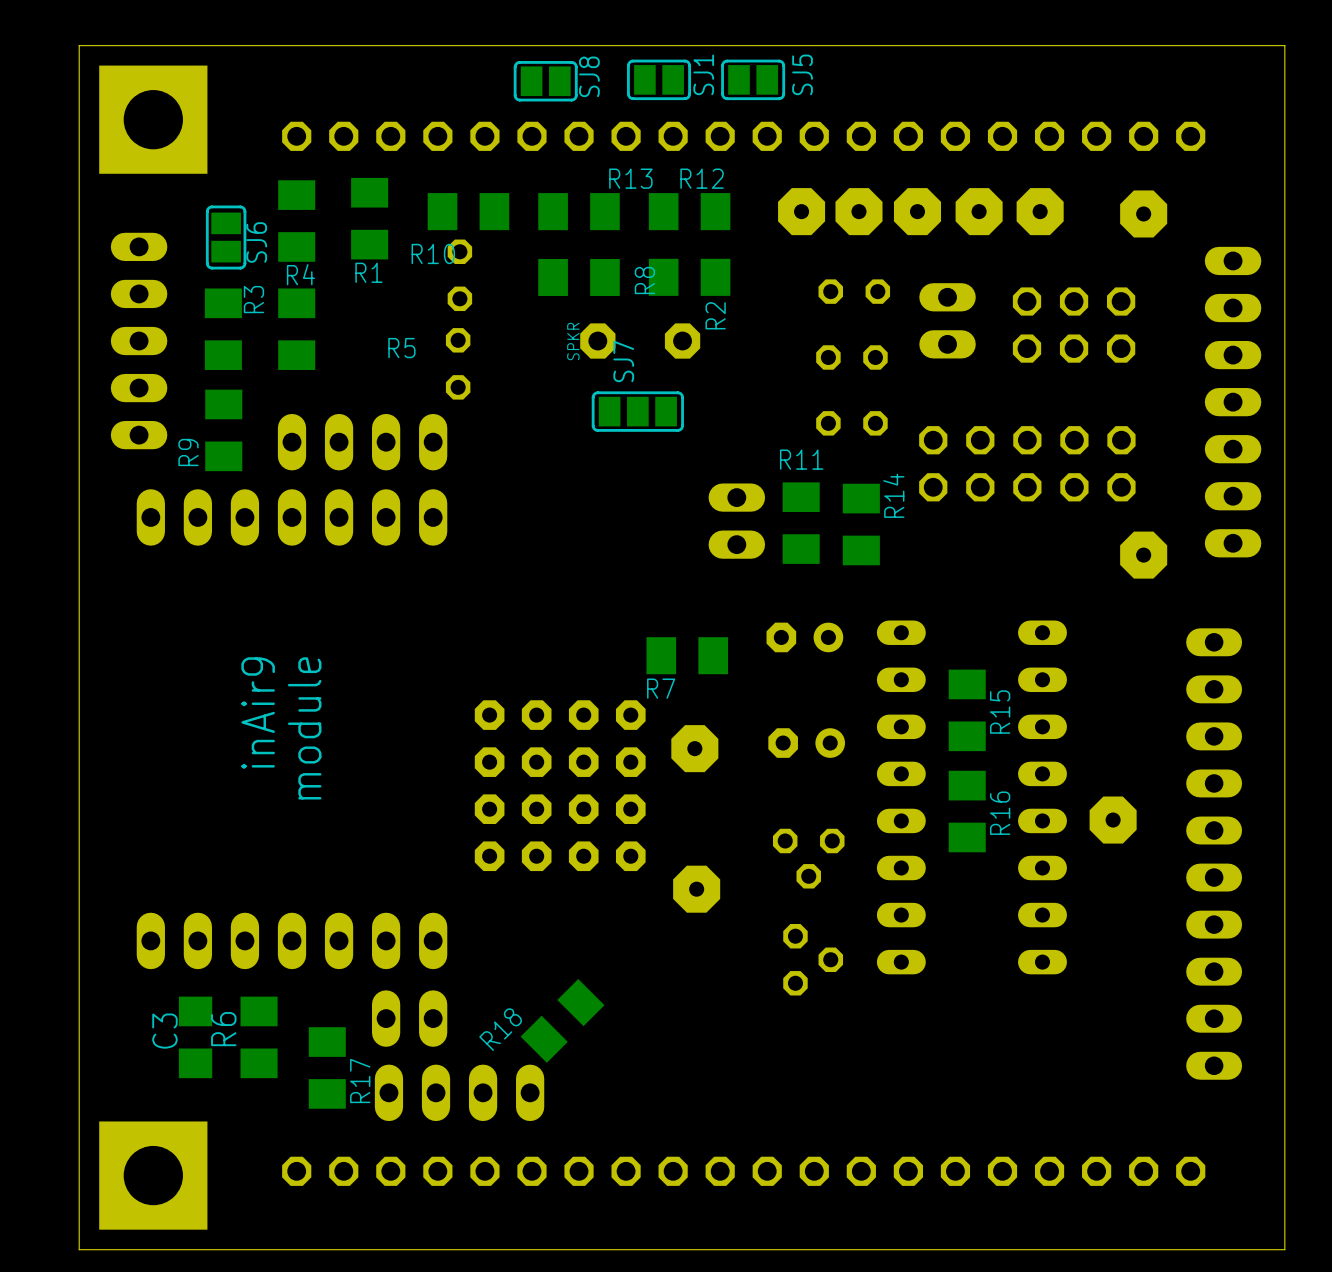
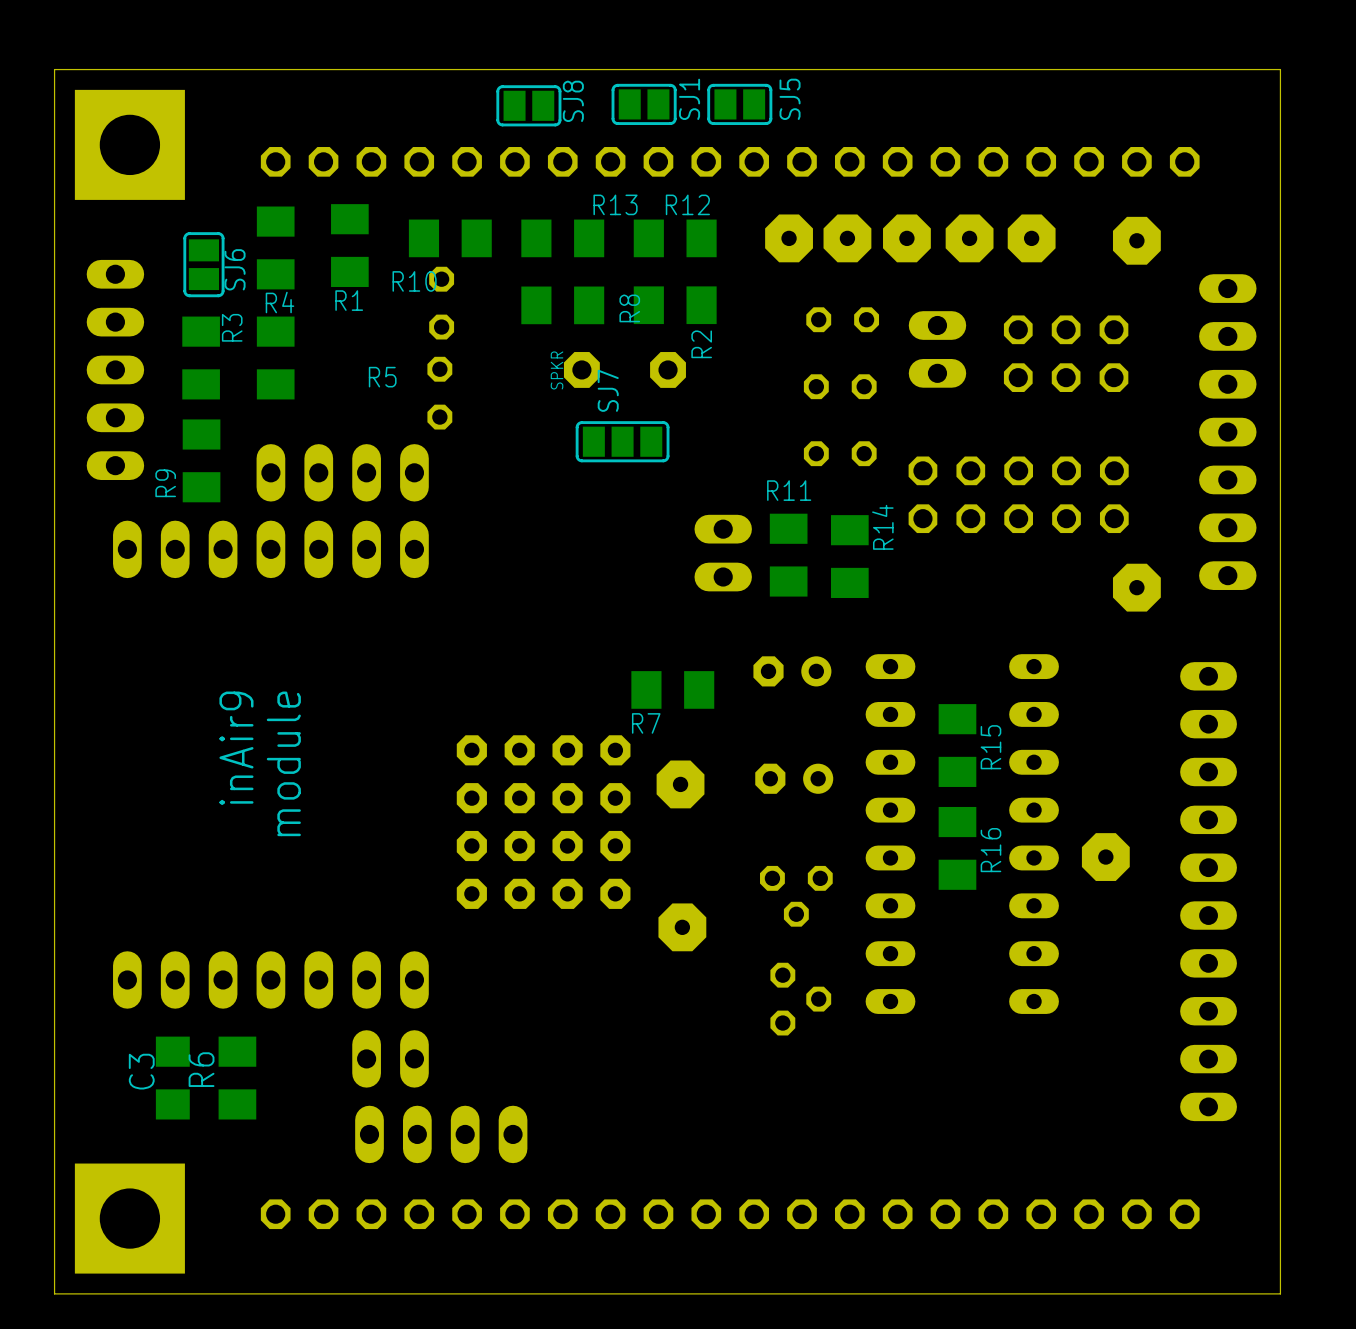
R18: (562, 1020) -> none
R17: (327, 1067) -> none

